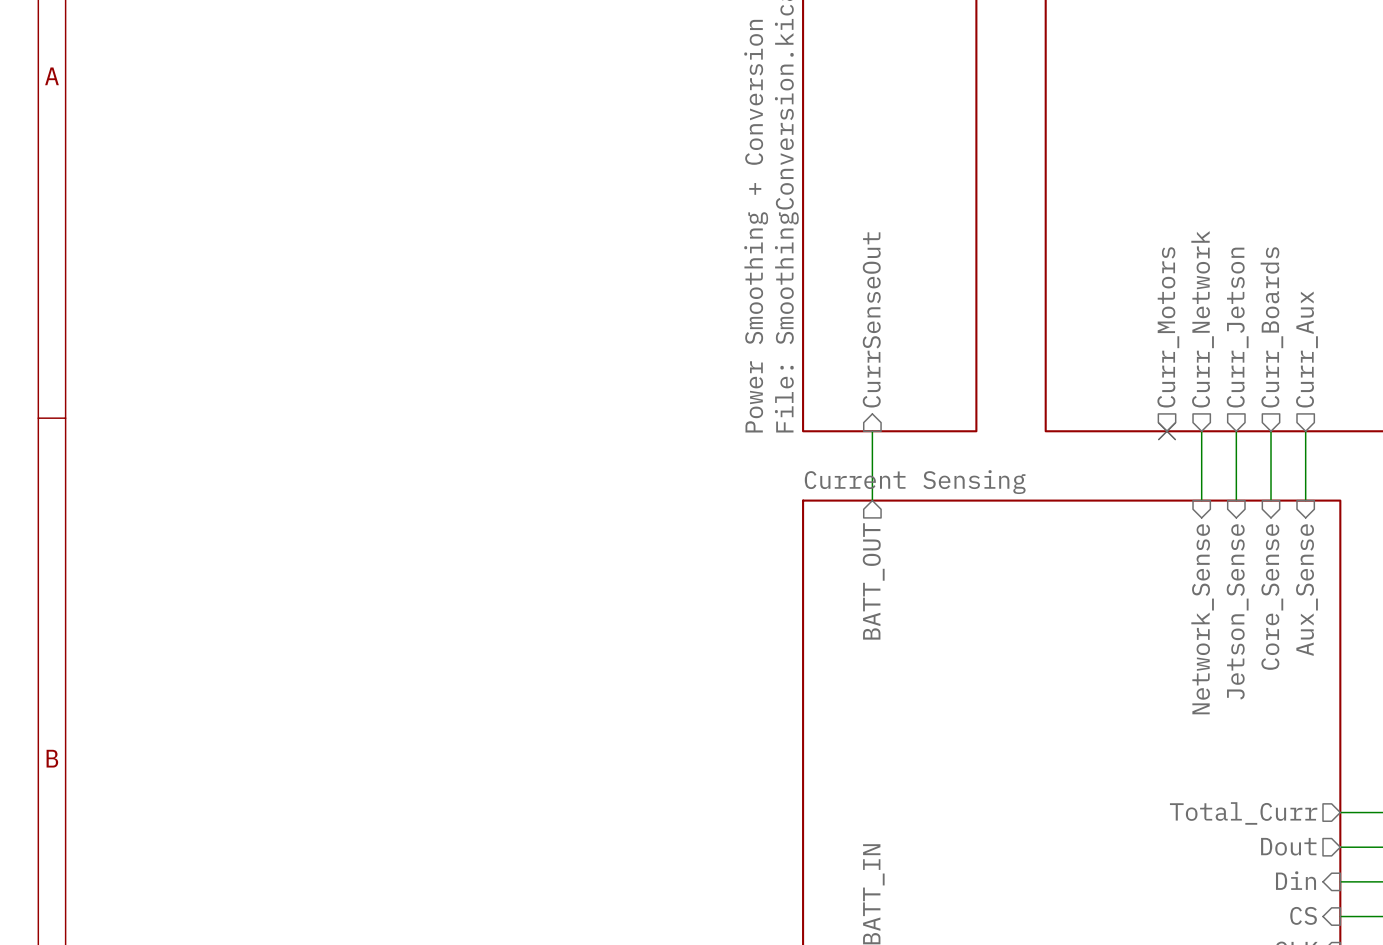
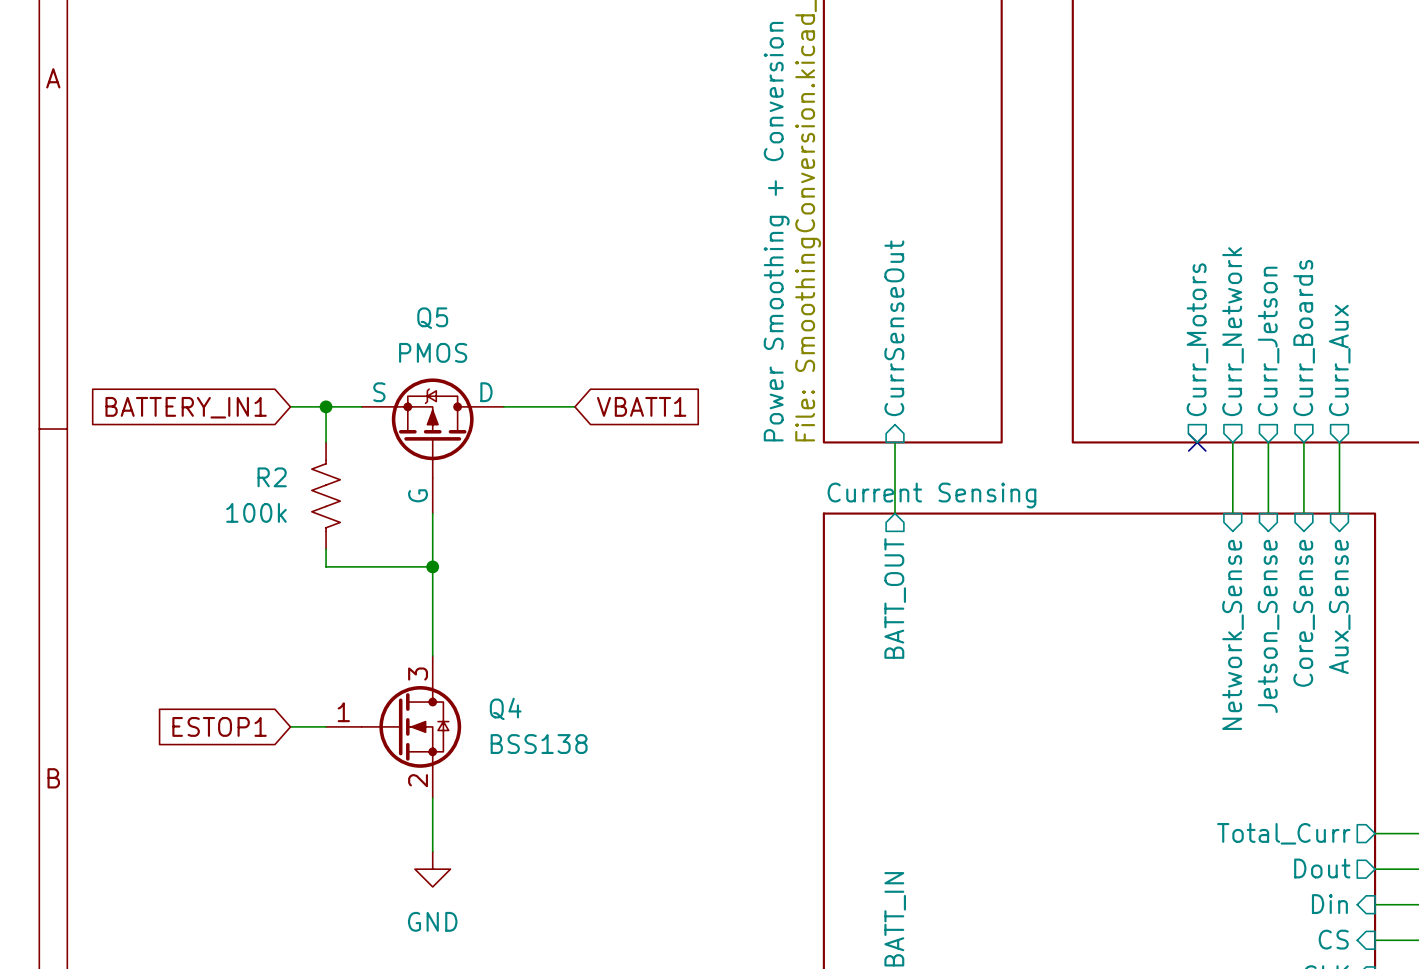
wire: none -> (290, 406) (361, 406)
wire: none -> (326, 406) (326, 442)
junction: none -> (326, 406)
wire: none -> (503, 406) (574, 406)
global label: none -> VBATT1 (641, 406)
global label: none -> BATTERY_IN1 (186, 407)
Q5: none -> PMOS (432, 446)
R2: none -> 100k (326, 495)
wire: none -> (432, 513) (432, 655)
wire: none -> (326, 549) (326, 566) (432, 566)
junction: none -> (432, 566)
global label: none -> ESTOP1 (219, 726)
wire: none -> (290, 726) (326, 726)
Q4: none -> BSS138 (393, 726)
wire: none -> (432, 798) (432, 851)
power symbol: none -> GND (432, 869)

